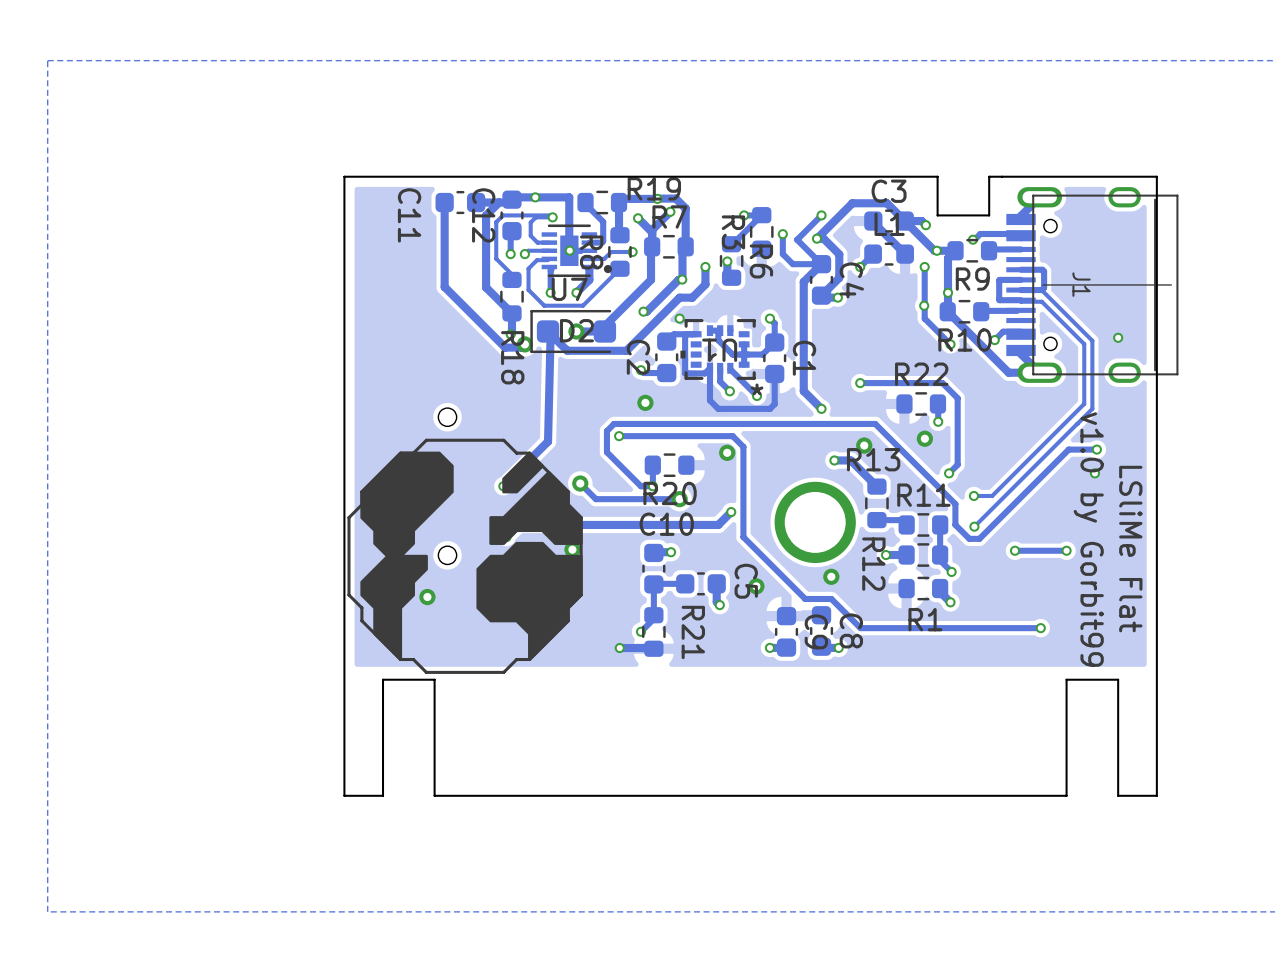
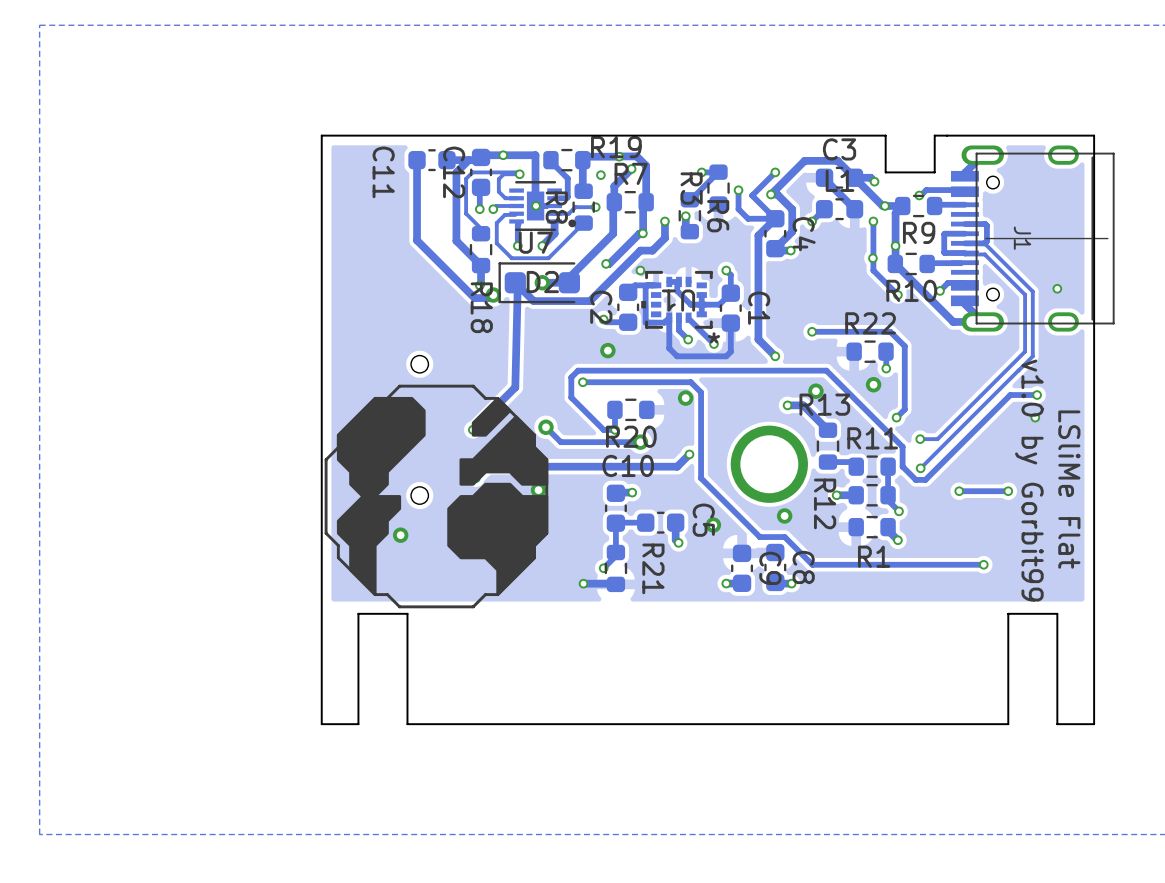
track: (638, 218) (652, 232) -> none

